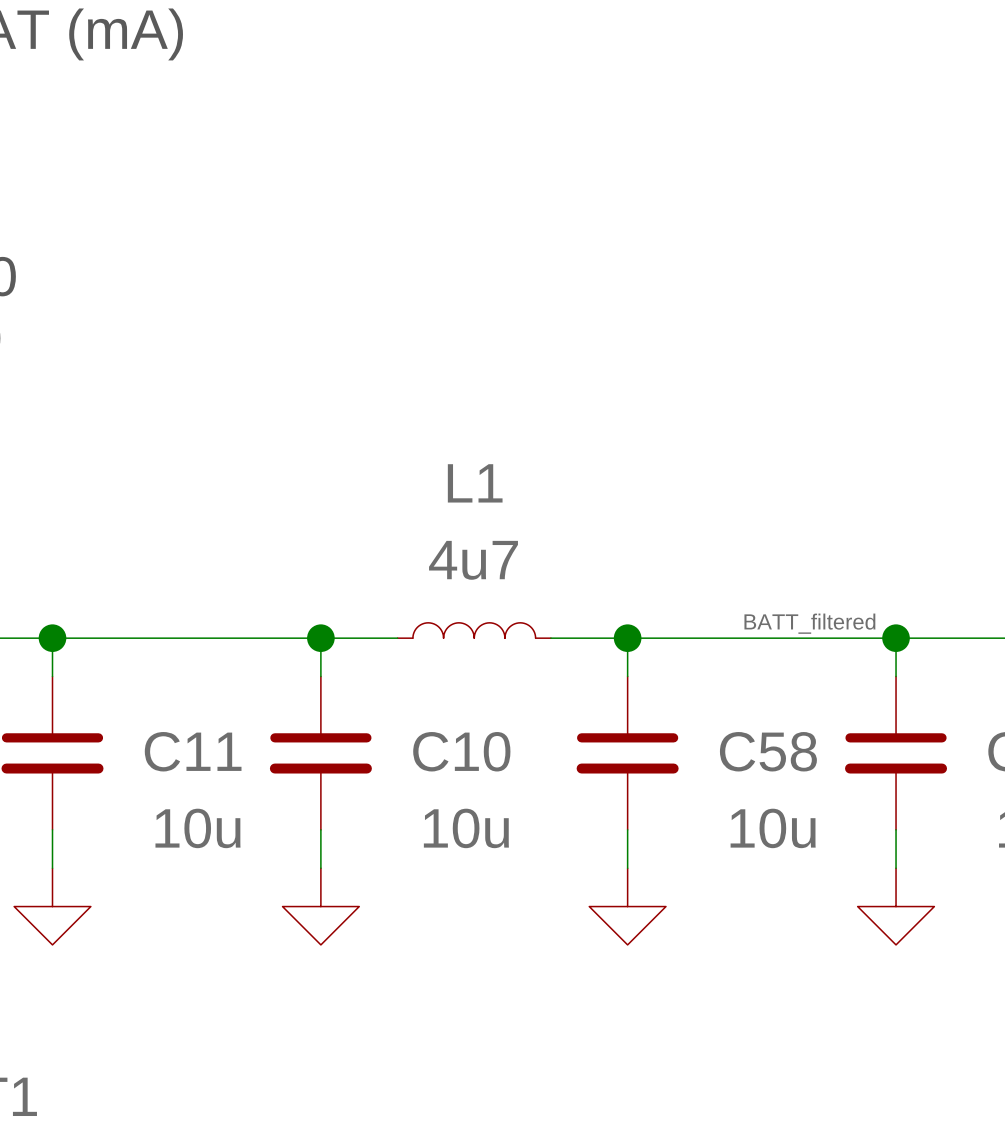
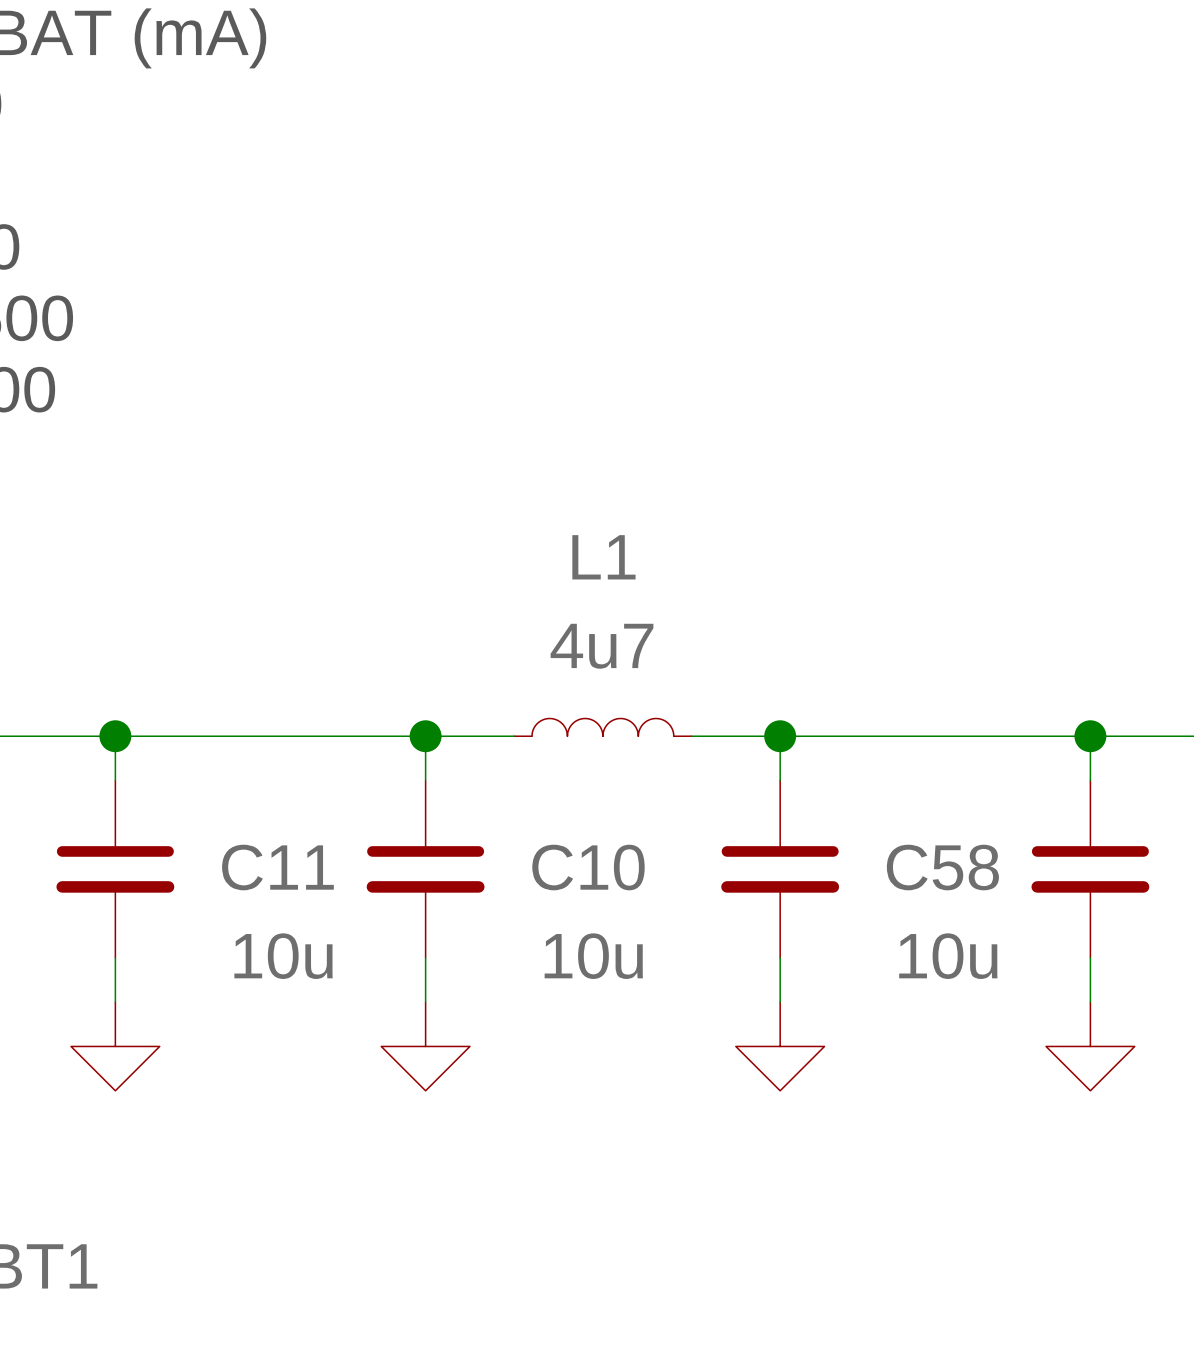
label: BATT_filtered (809, 623) -> none

